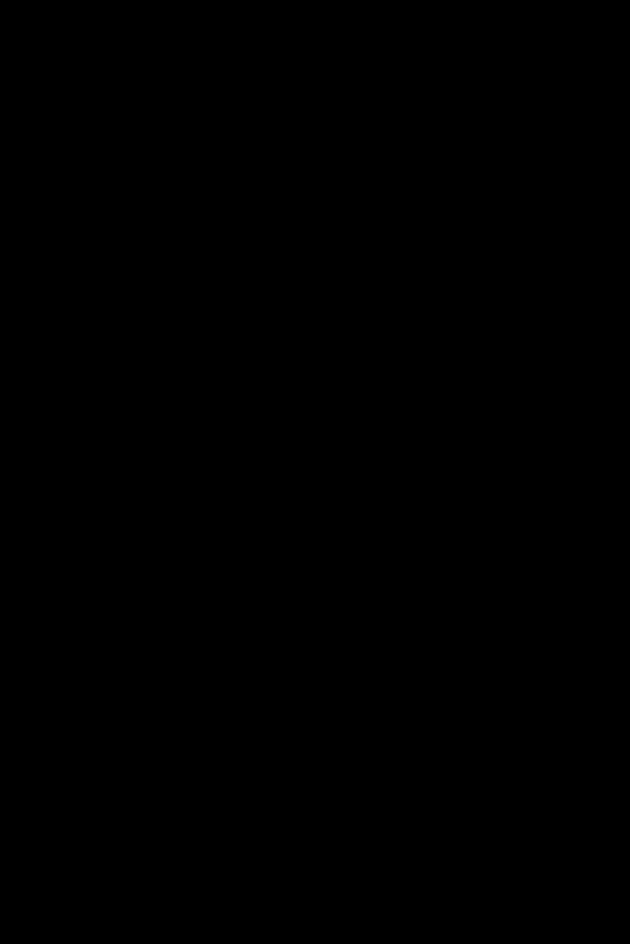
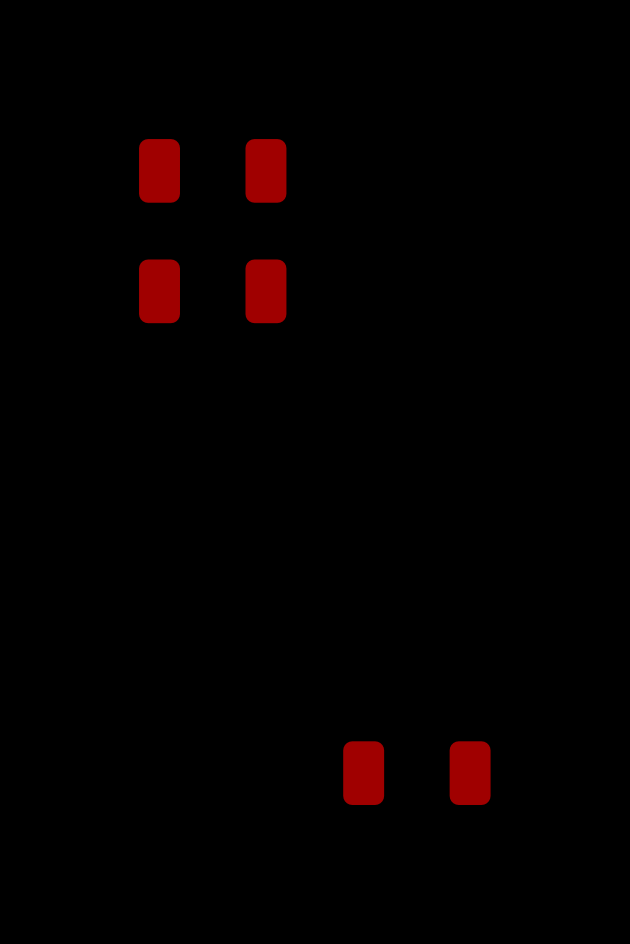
part: none -> (212, 170)
part: none -> (212, 291)
part: none -> (416, 773)

